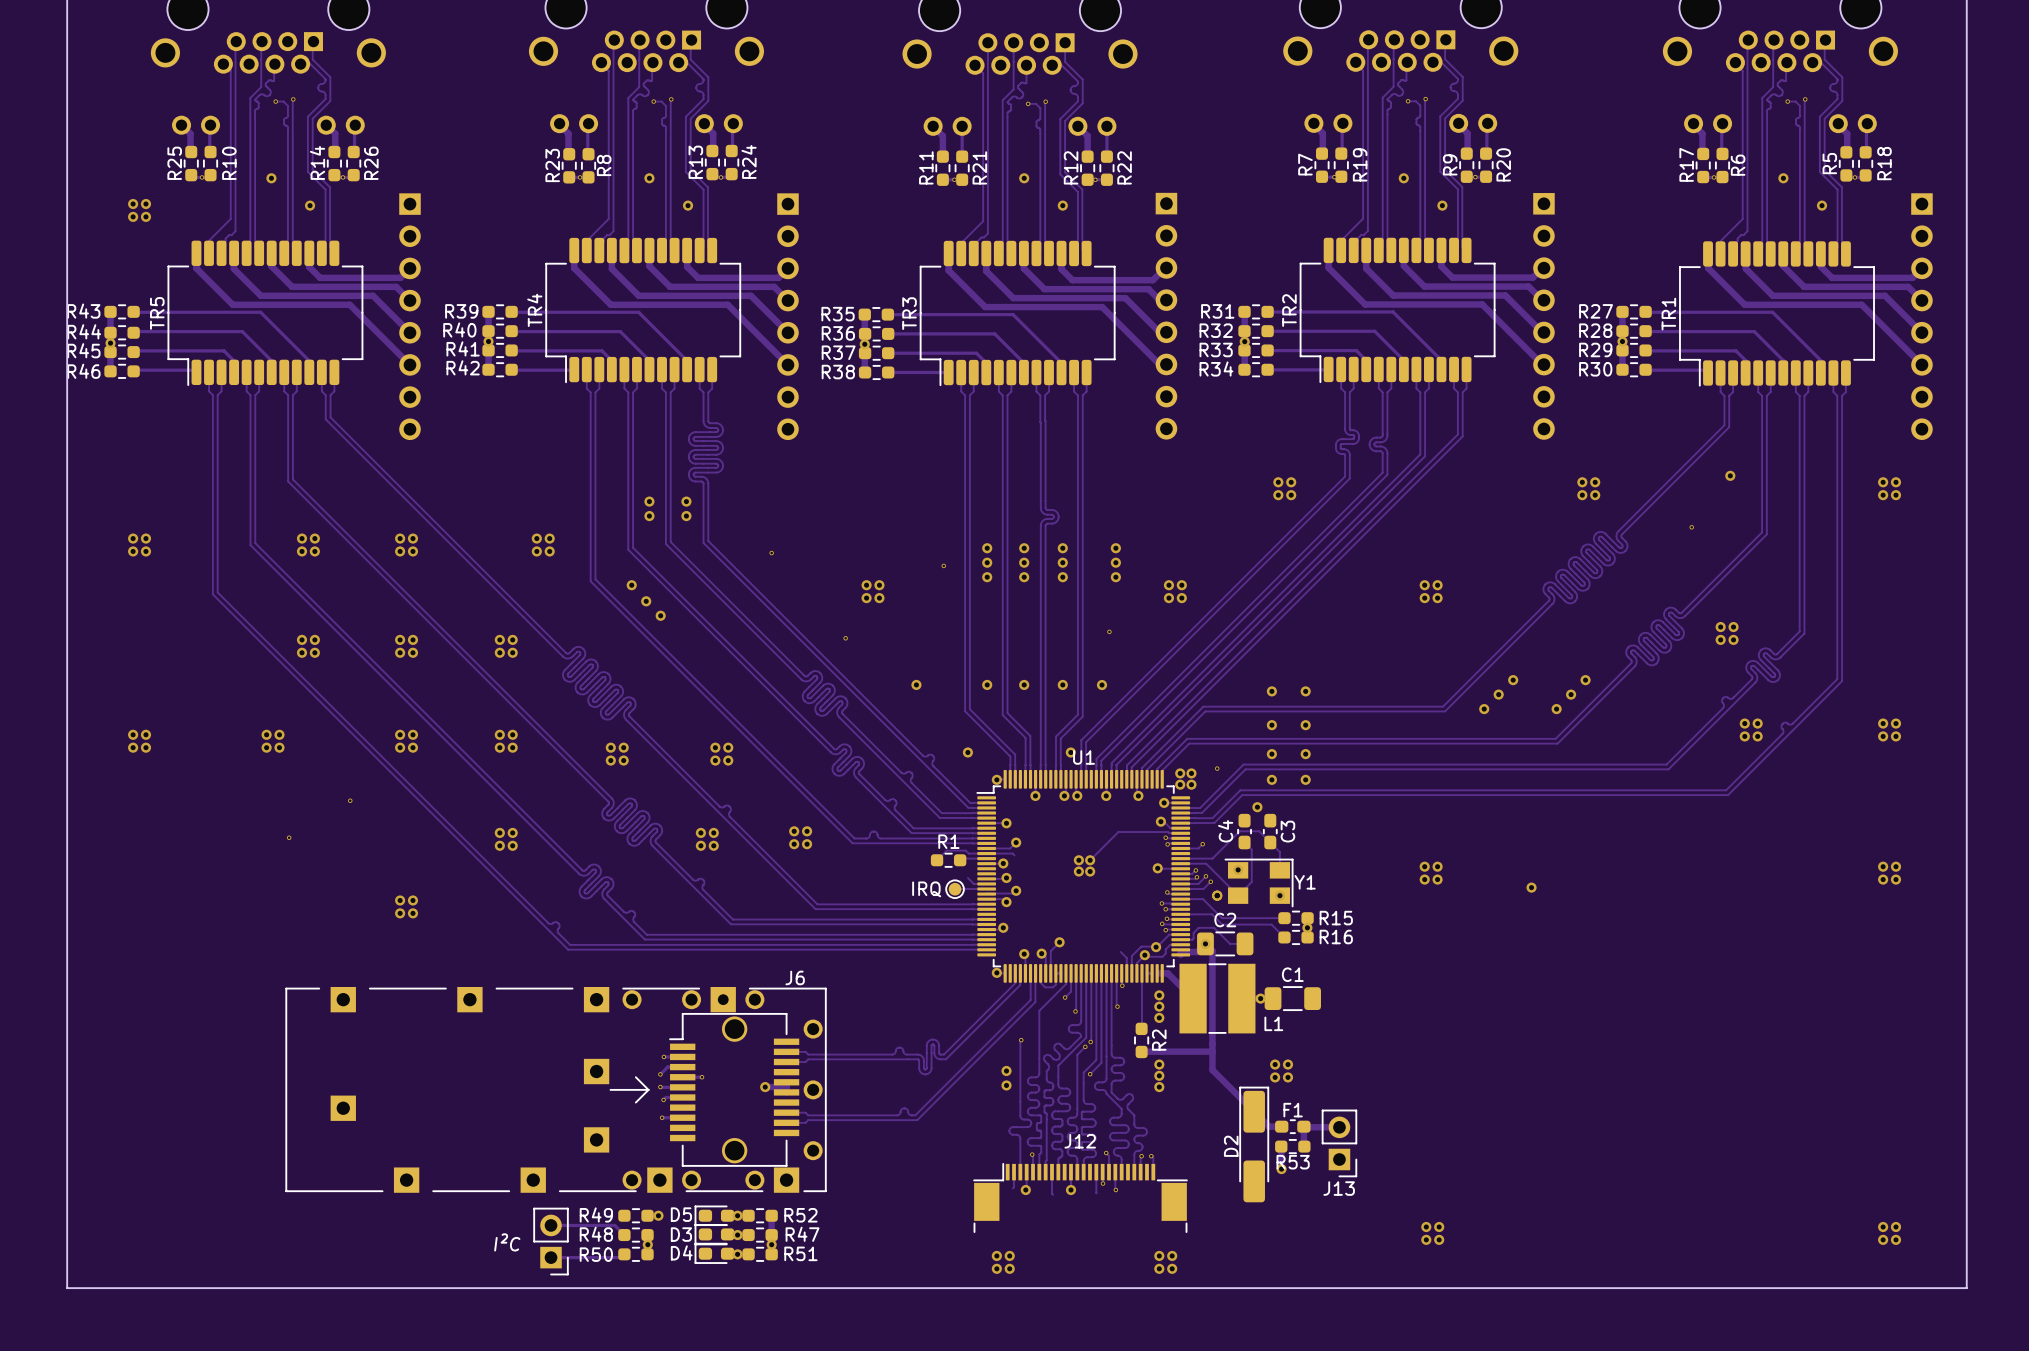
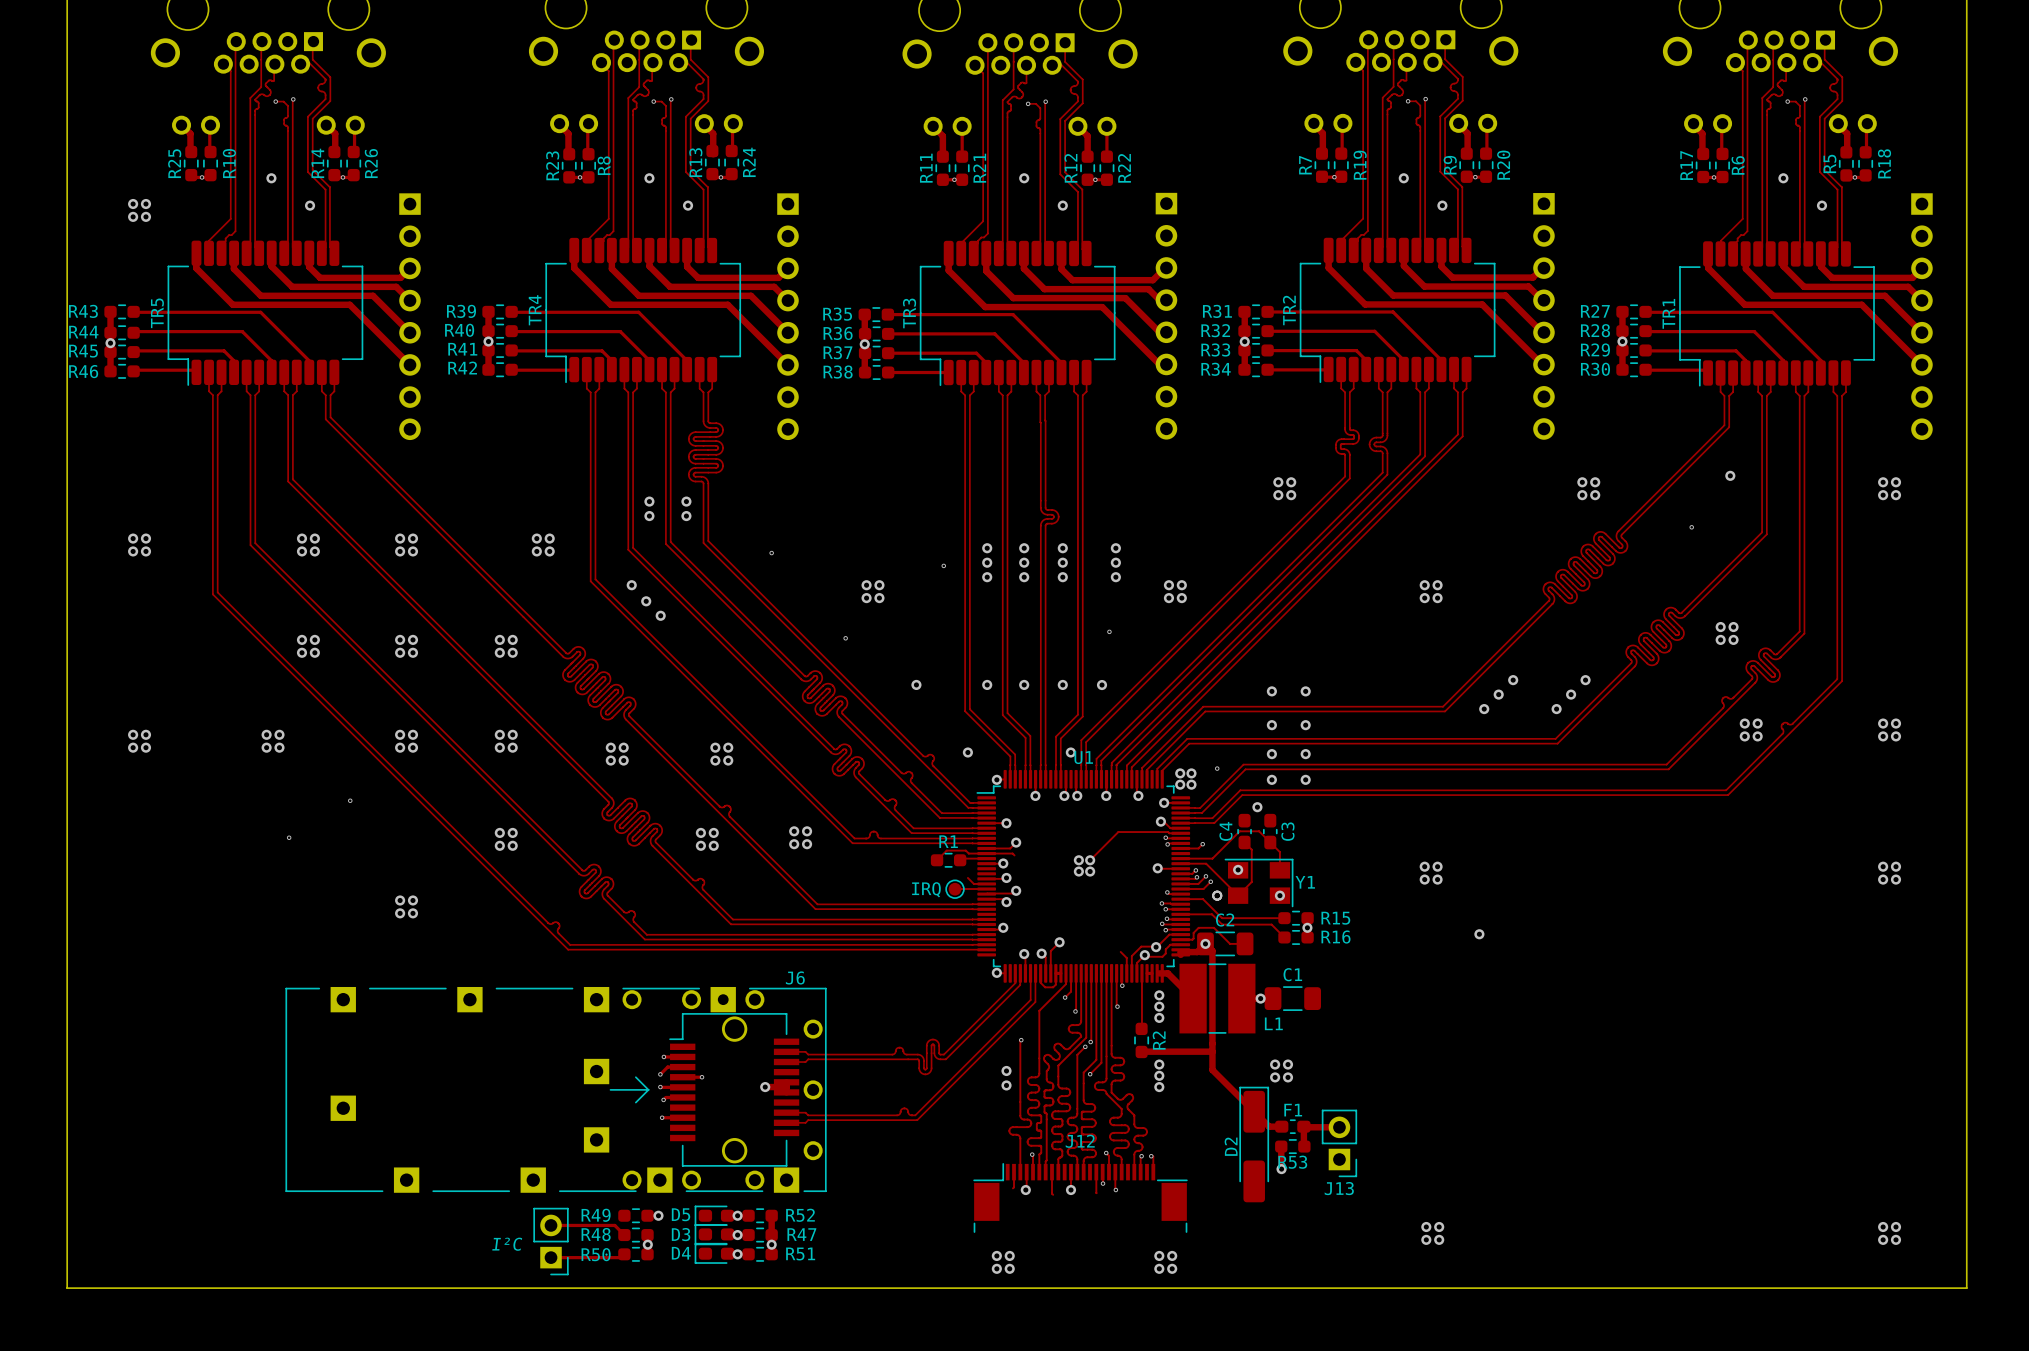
via position: (1531, 887) -> (1479, 934)

